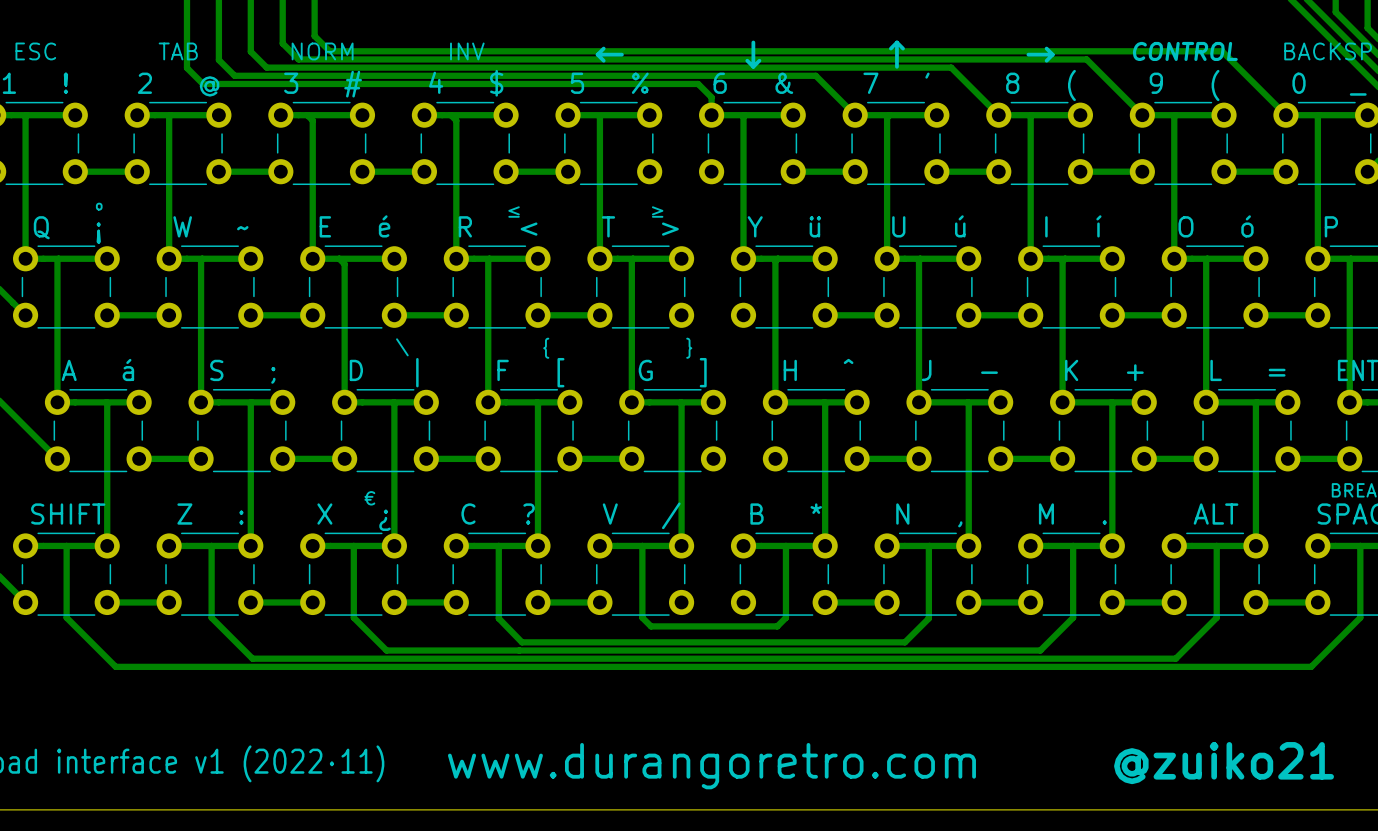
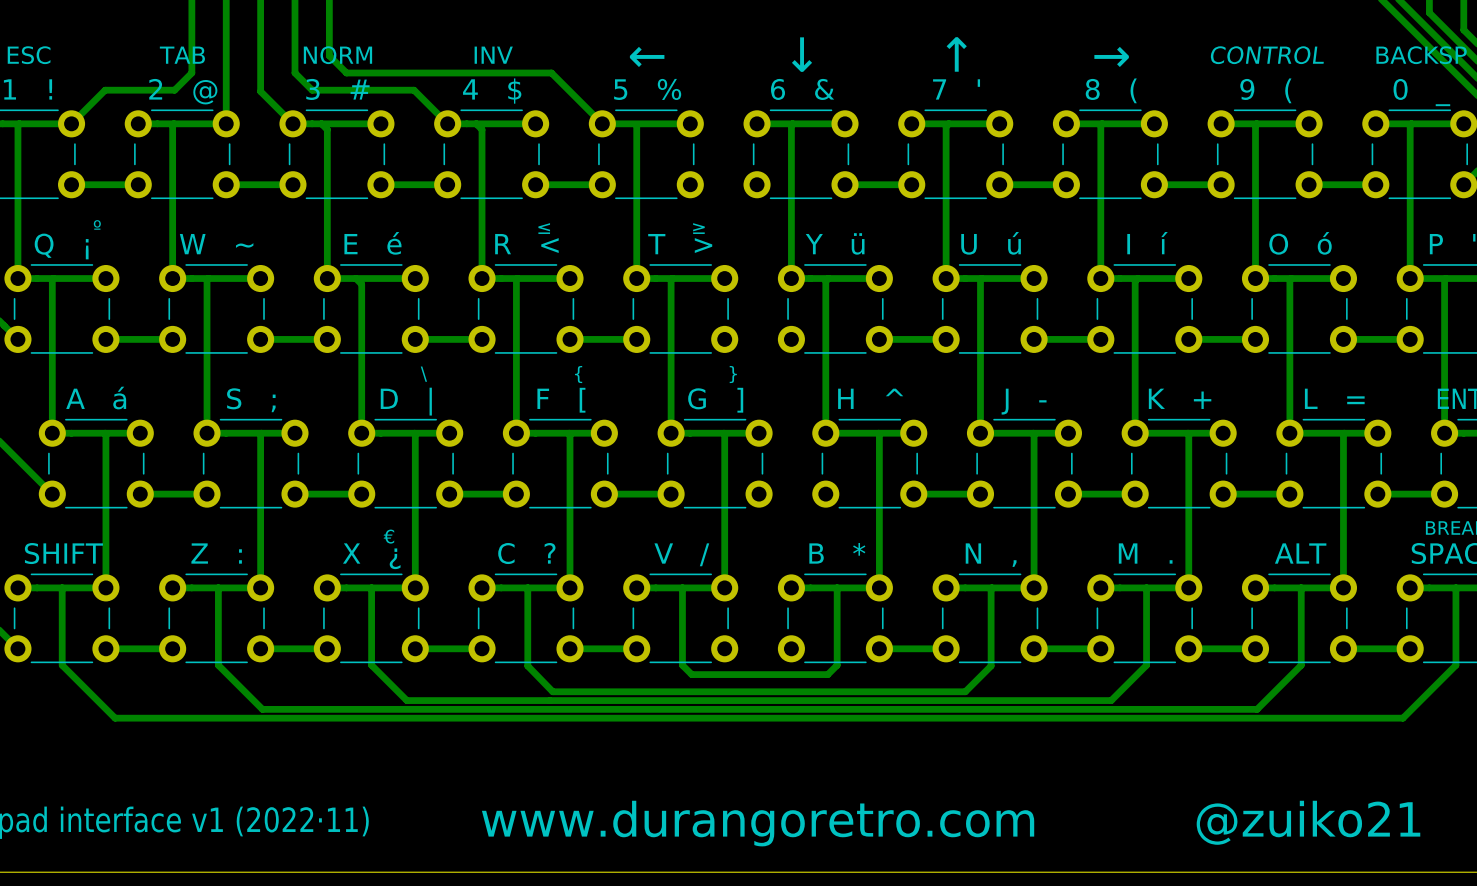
bottom track: (314, 36) (329, 51) (1222, 51) (1285, 115) -> (329, 38) (329, 55) (346, 73) (551, 73) (602, 123)
bottom track: (282, 43) (298, 59) (1086, 59) (1142, 115) -> none
bottom track: (250, 51) (266, 67) (951, 67) (998, 115) -> (260, 55) (260, 91) (292, 123)
bottom track: (218, 60) (234, 75) (815, 75) (855, 115) -> (226, 64) (226, 123)
bottom track: (186, 68) (202, 83) (298, 83) -> (294, 46) (294, 73) (312, 90)
bottom track: none -> (191, 73) (174, 90) (105, 90) (71, 123)
bottom track: (393, 83) (698, 83) (711, 97) (711, 115) -> (414, 90) (447, 123)

